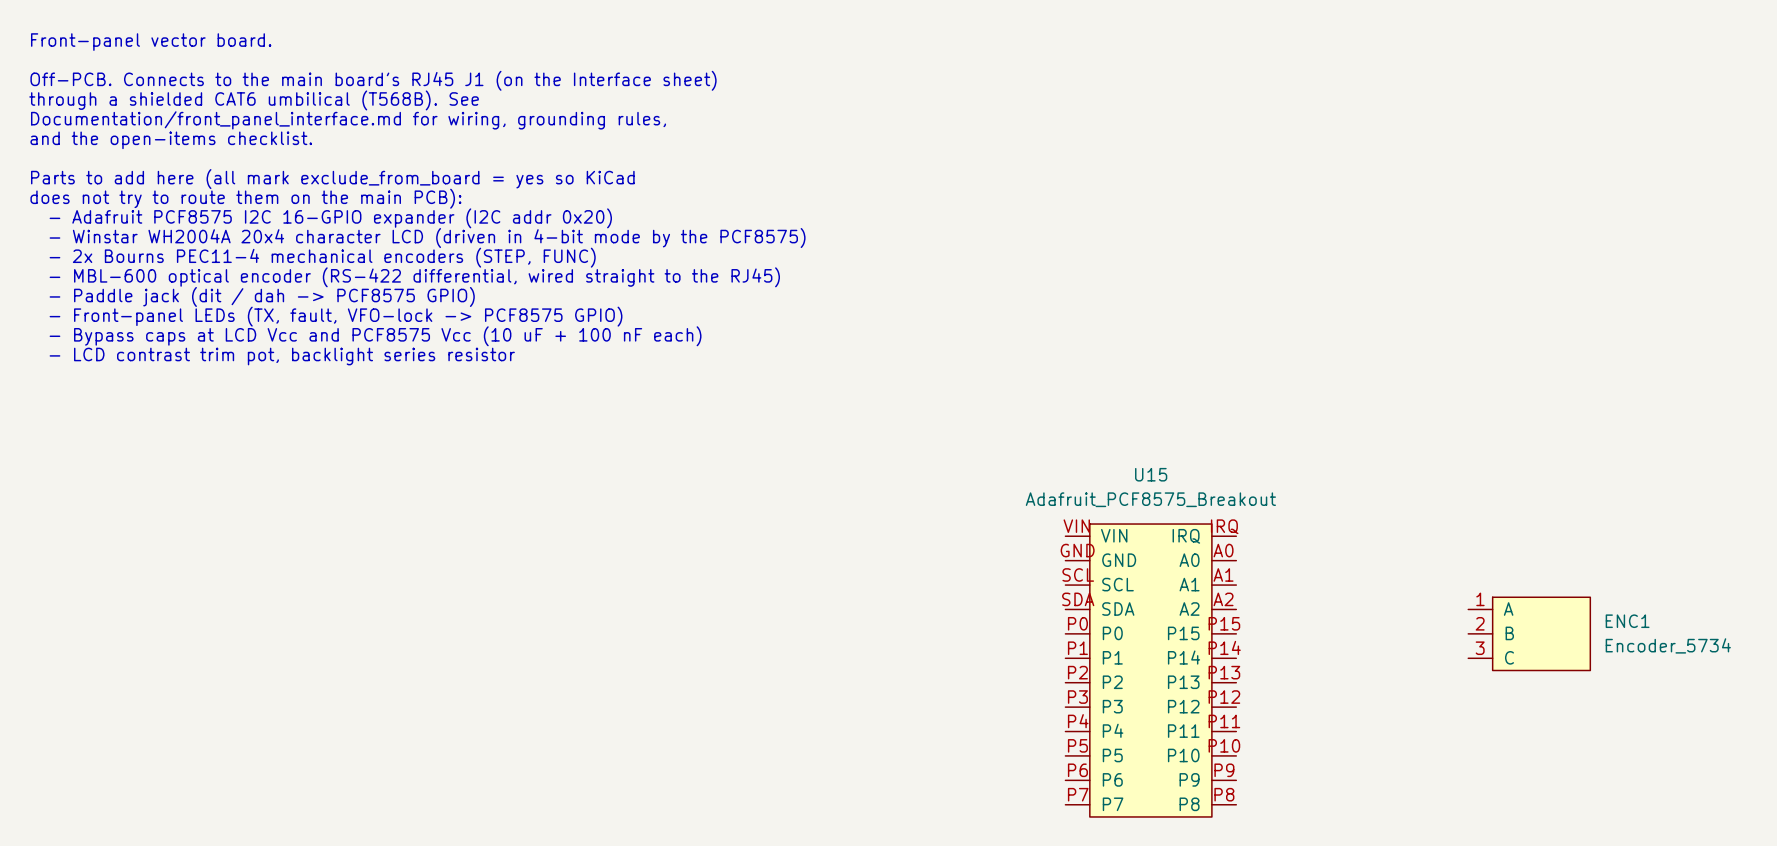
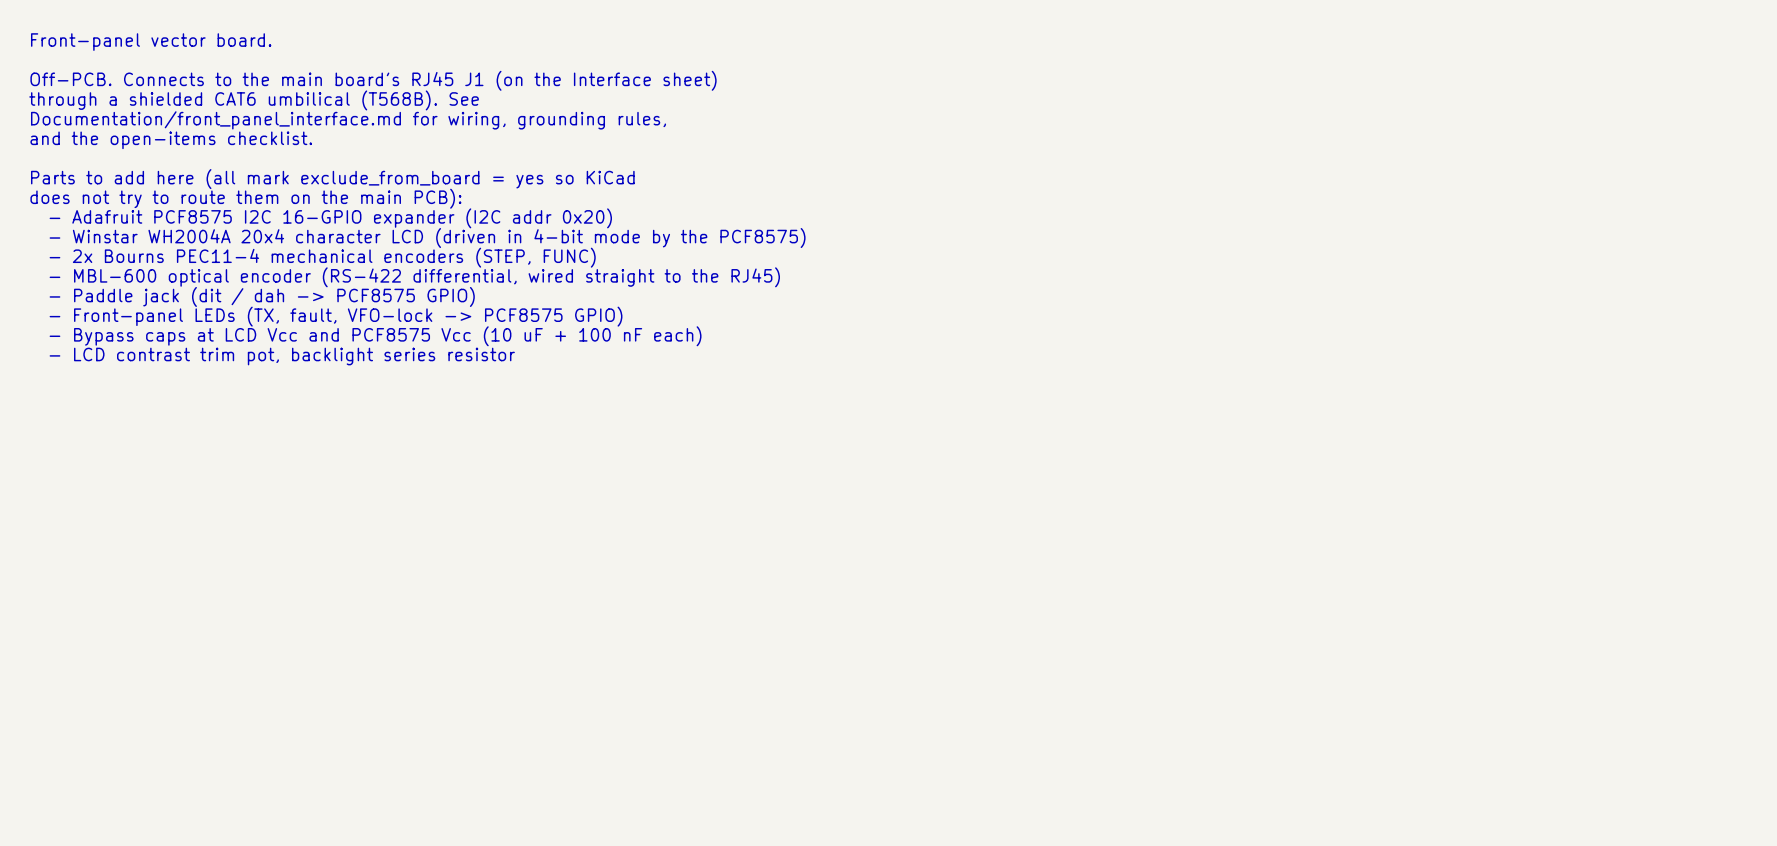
ENC1: Encoder_5734 (1529, 633) -> none
U15: Adafruit_PCF8575_Breakout (1150, 670) -> none

